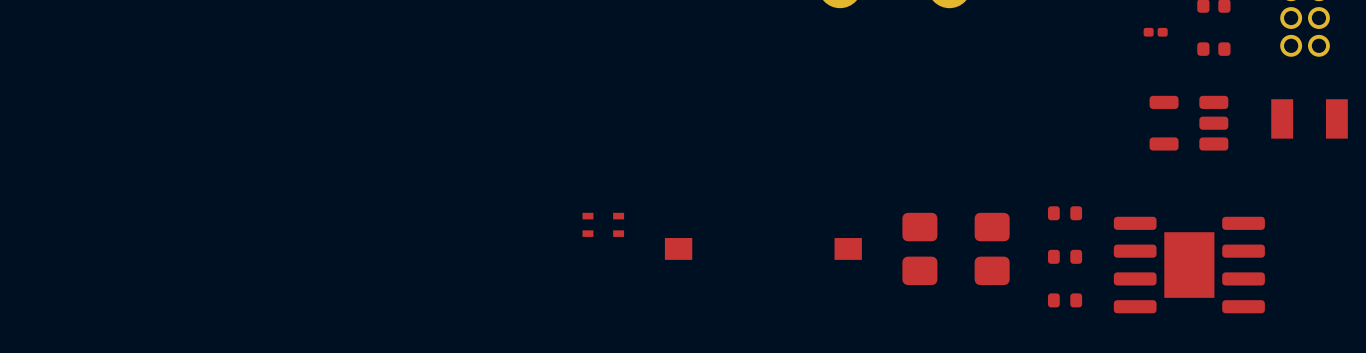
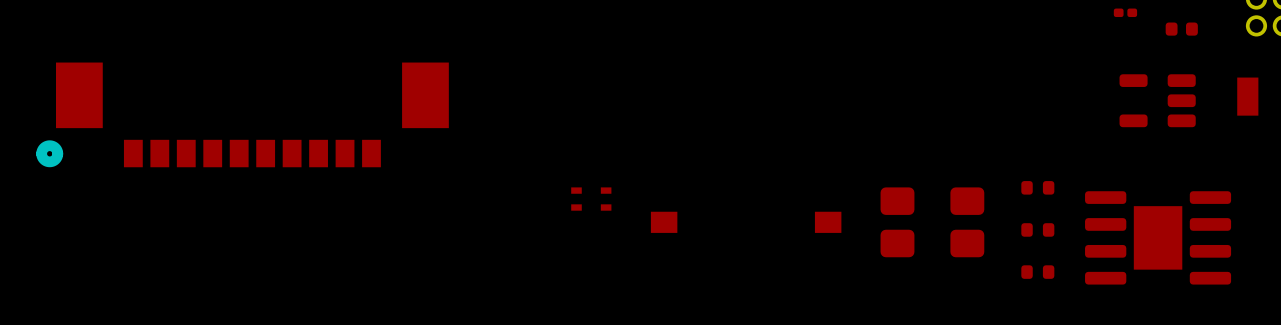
part: none -> (242, 114)

